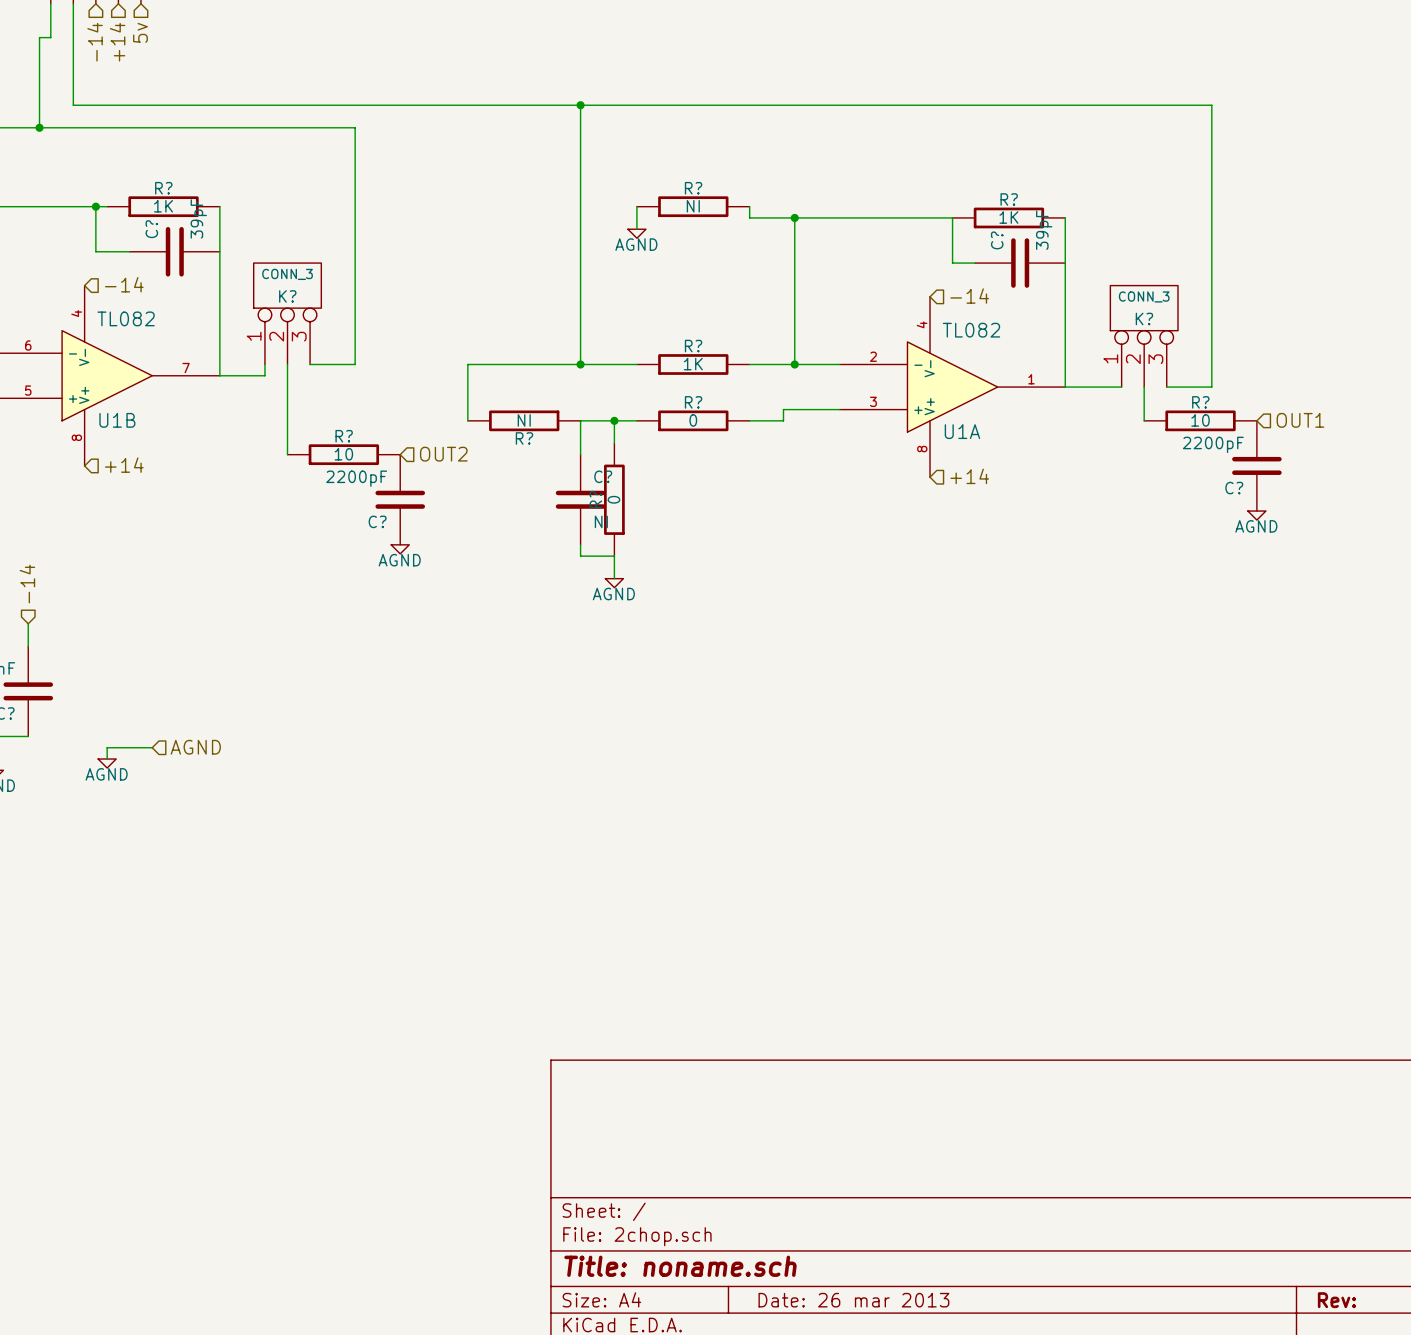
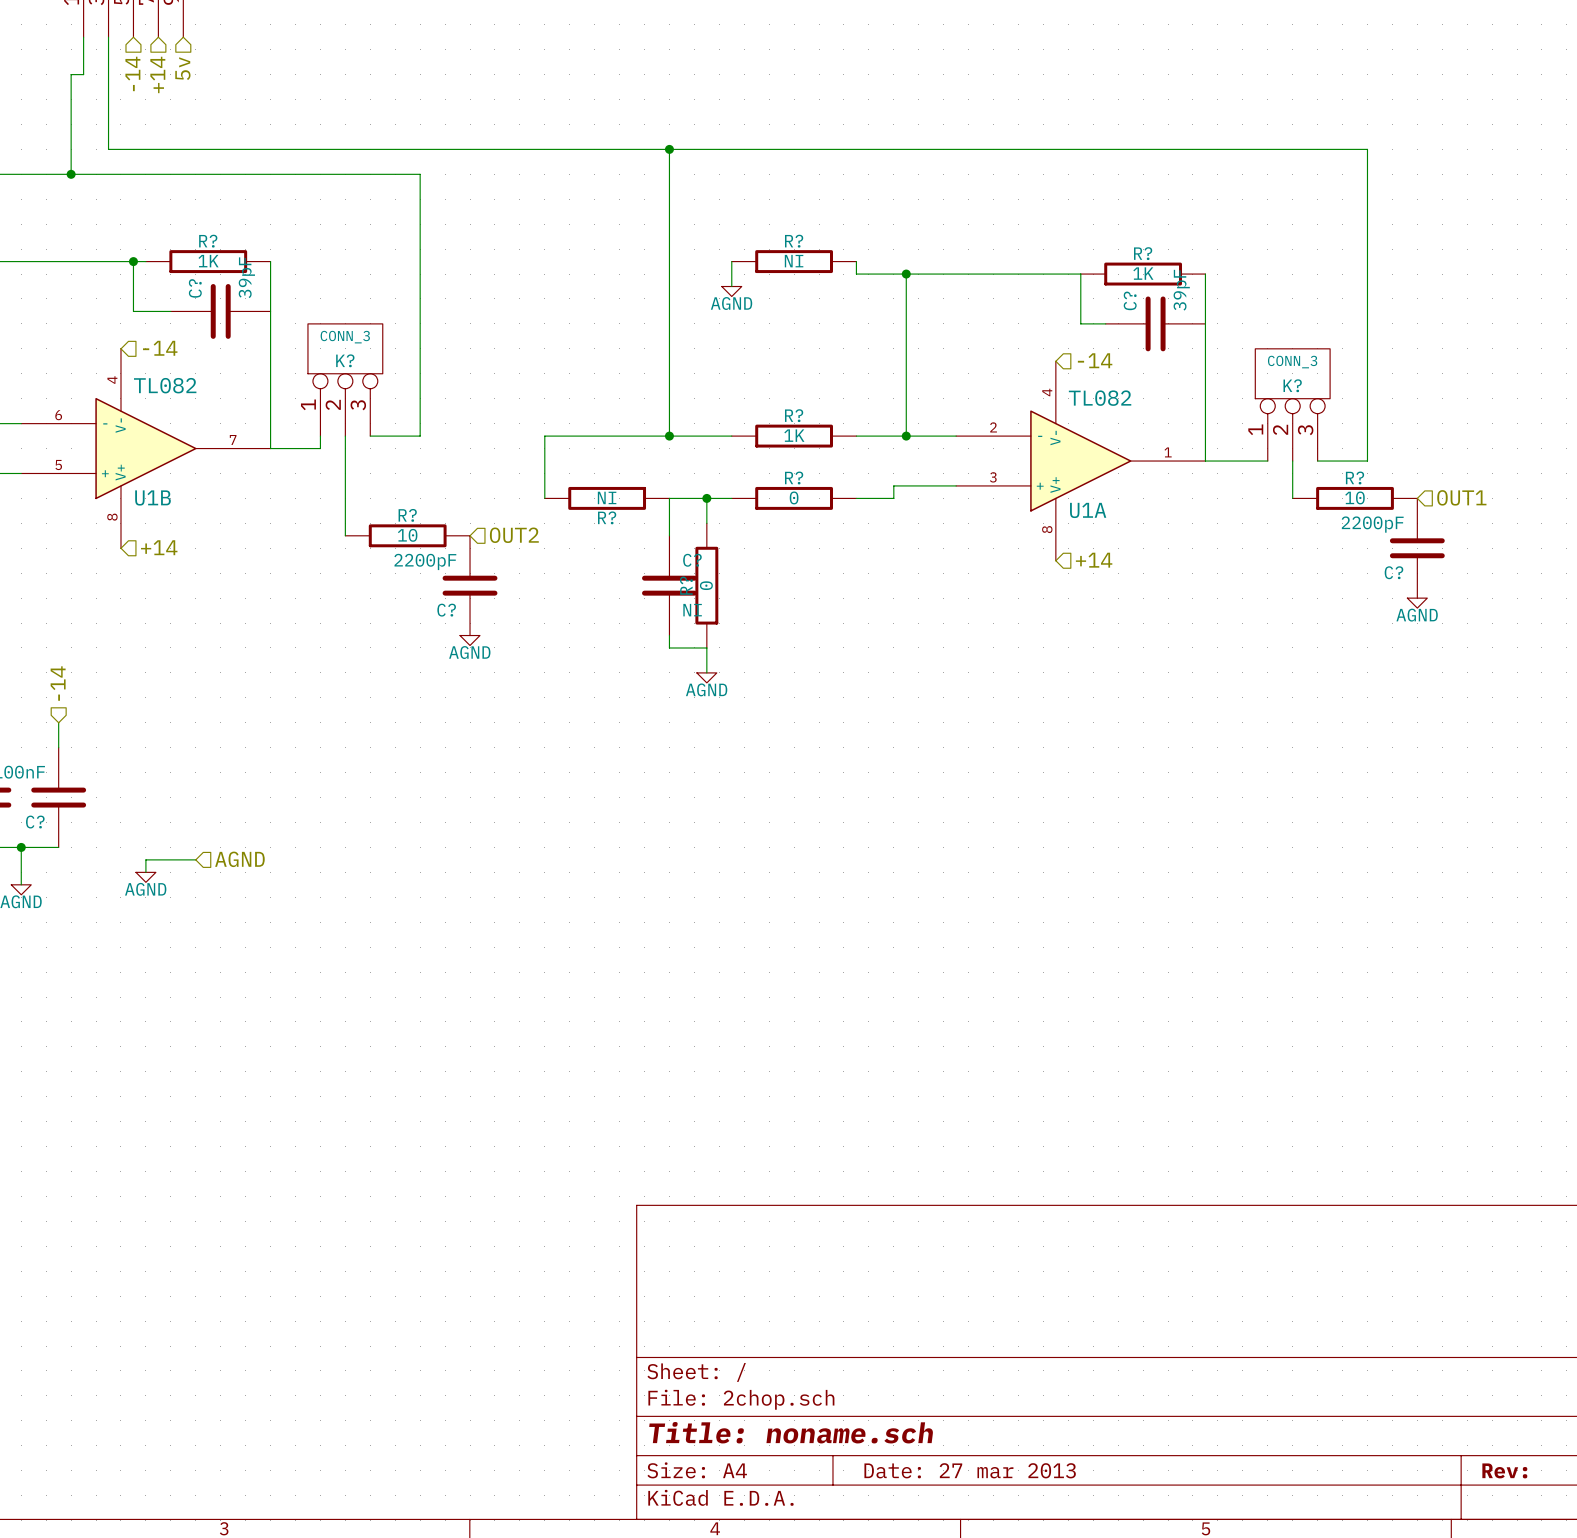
title block: Date: 26 mar 2013 (853, 1300) -> Date: 27 mar 2013 (970, 1470)

